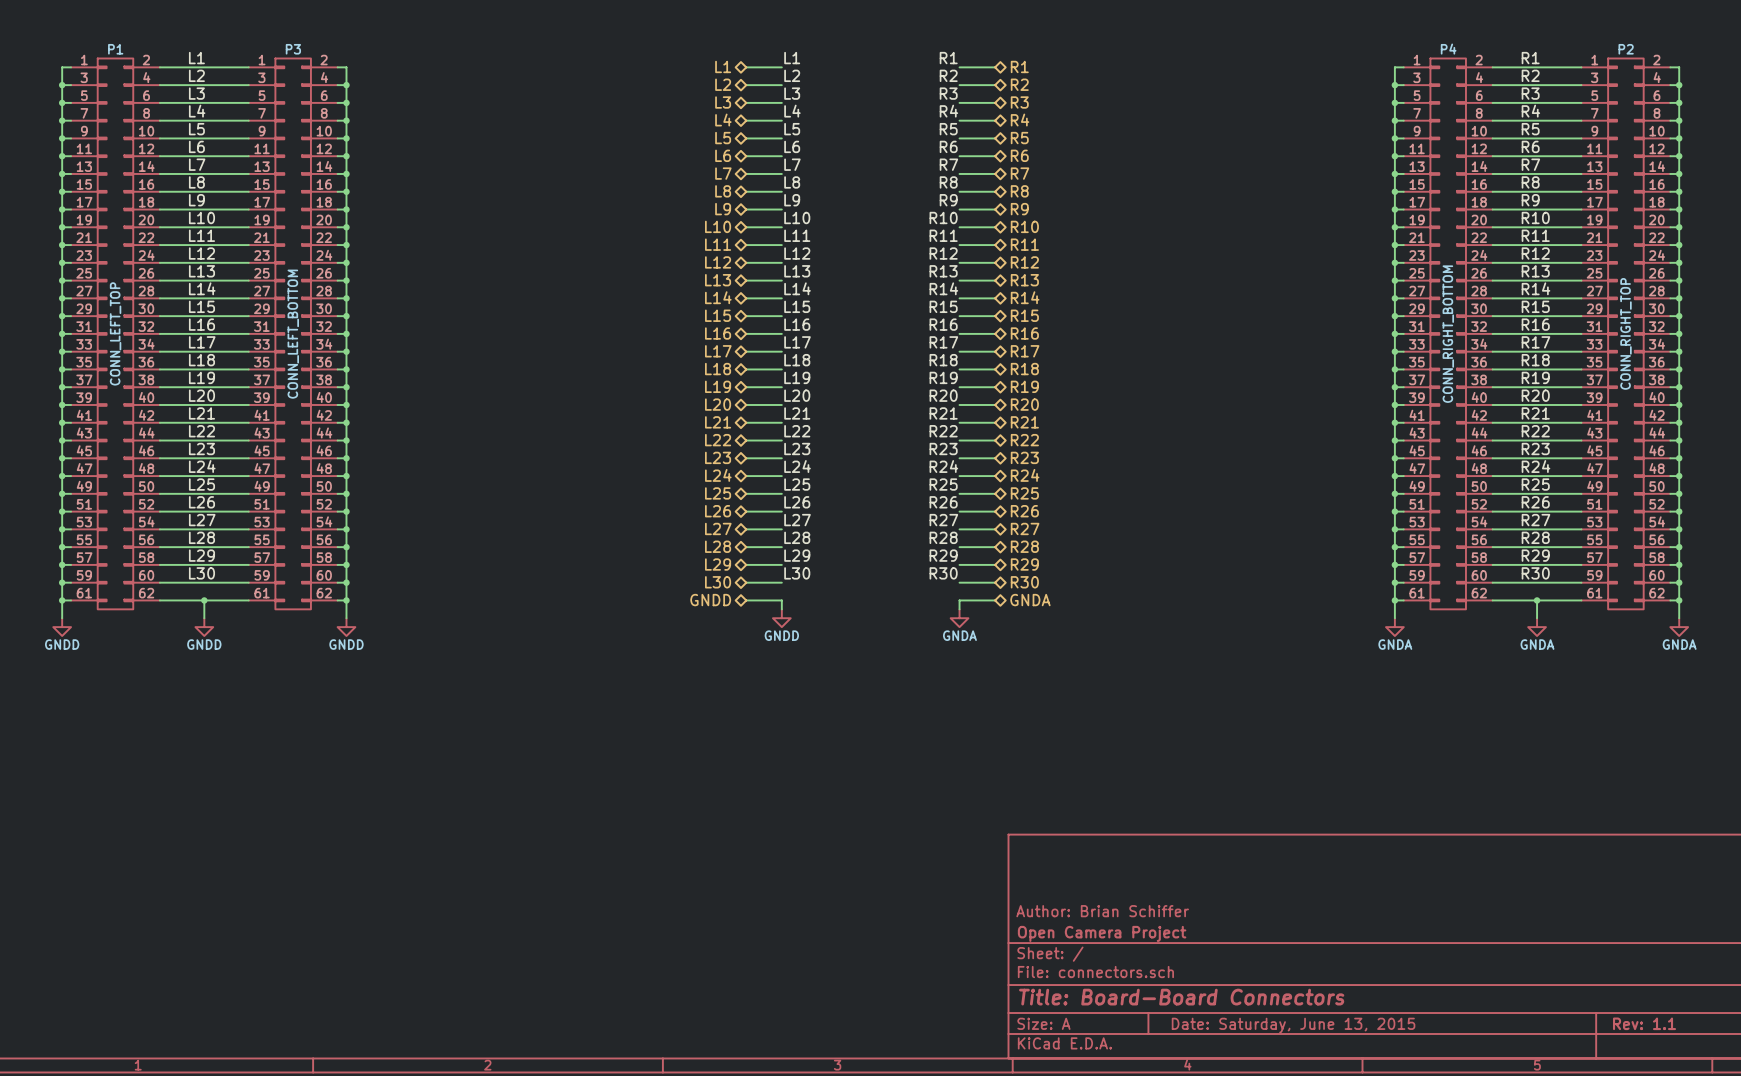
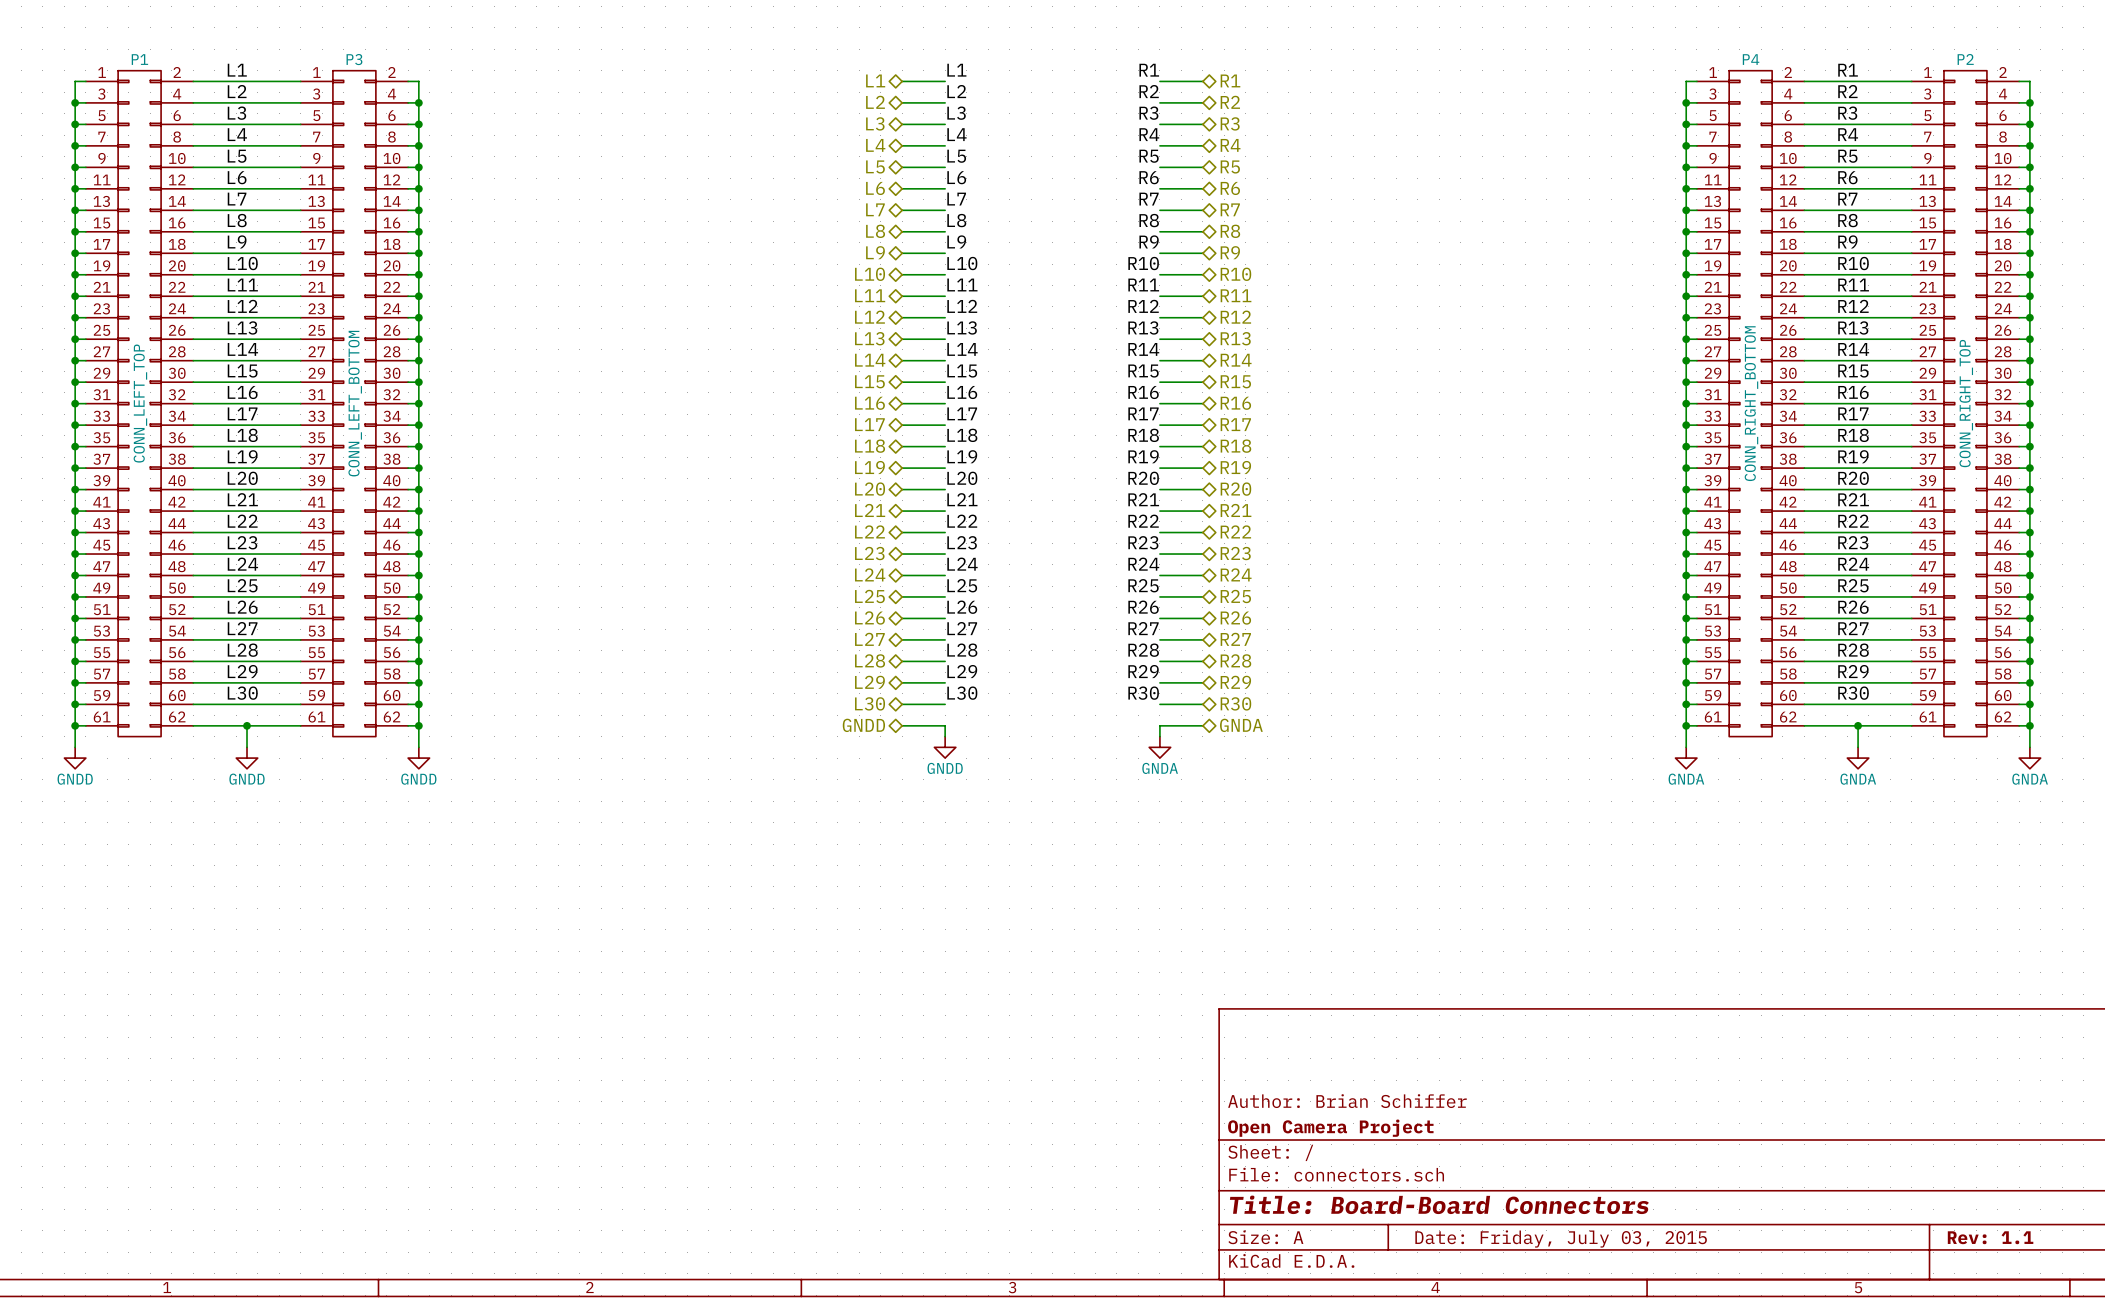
title block: Date: Saturday, June 13, 2015 (1293, 1025) -> Date: Friday, July 03, 2015 (1561, 1238)

